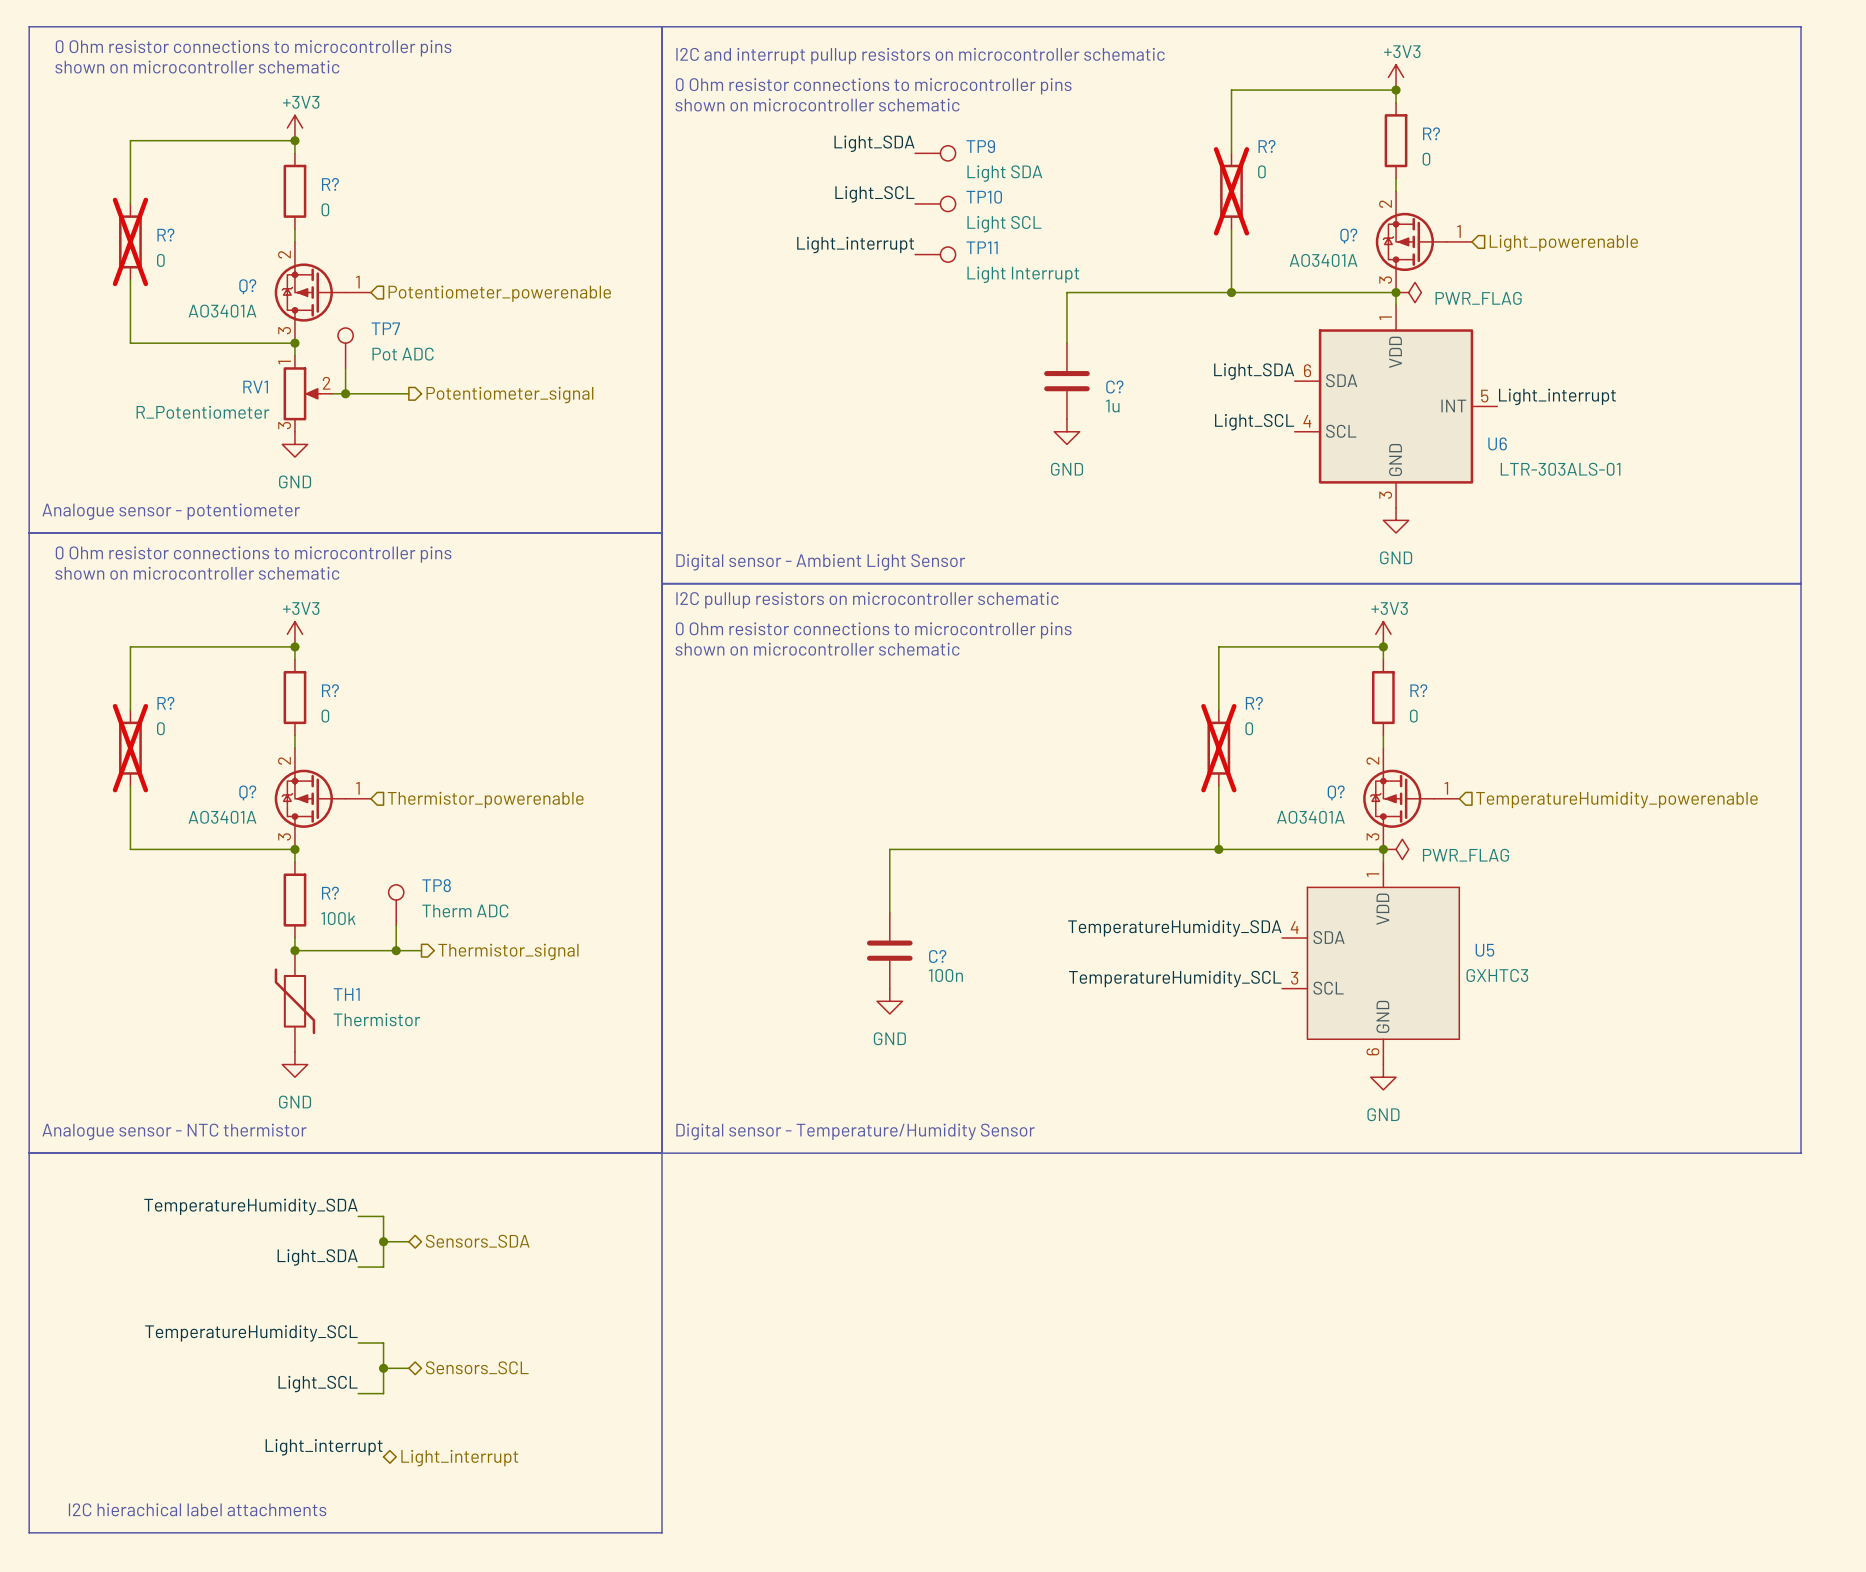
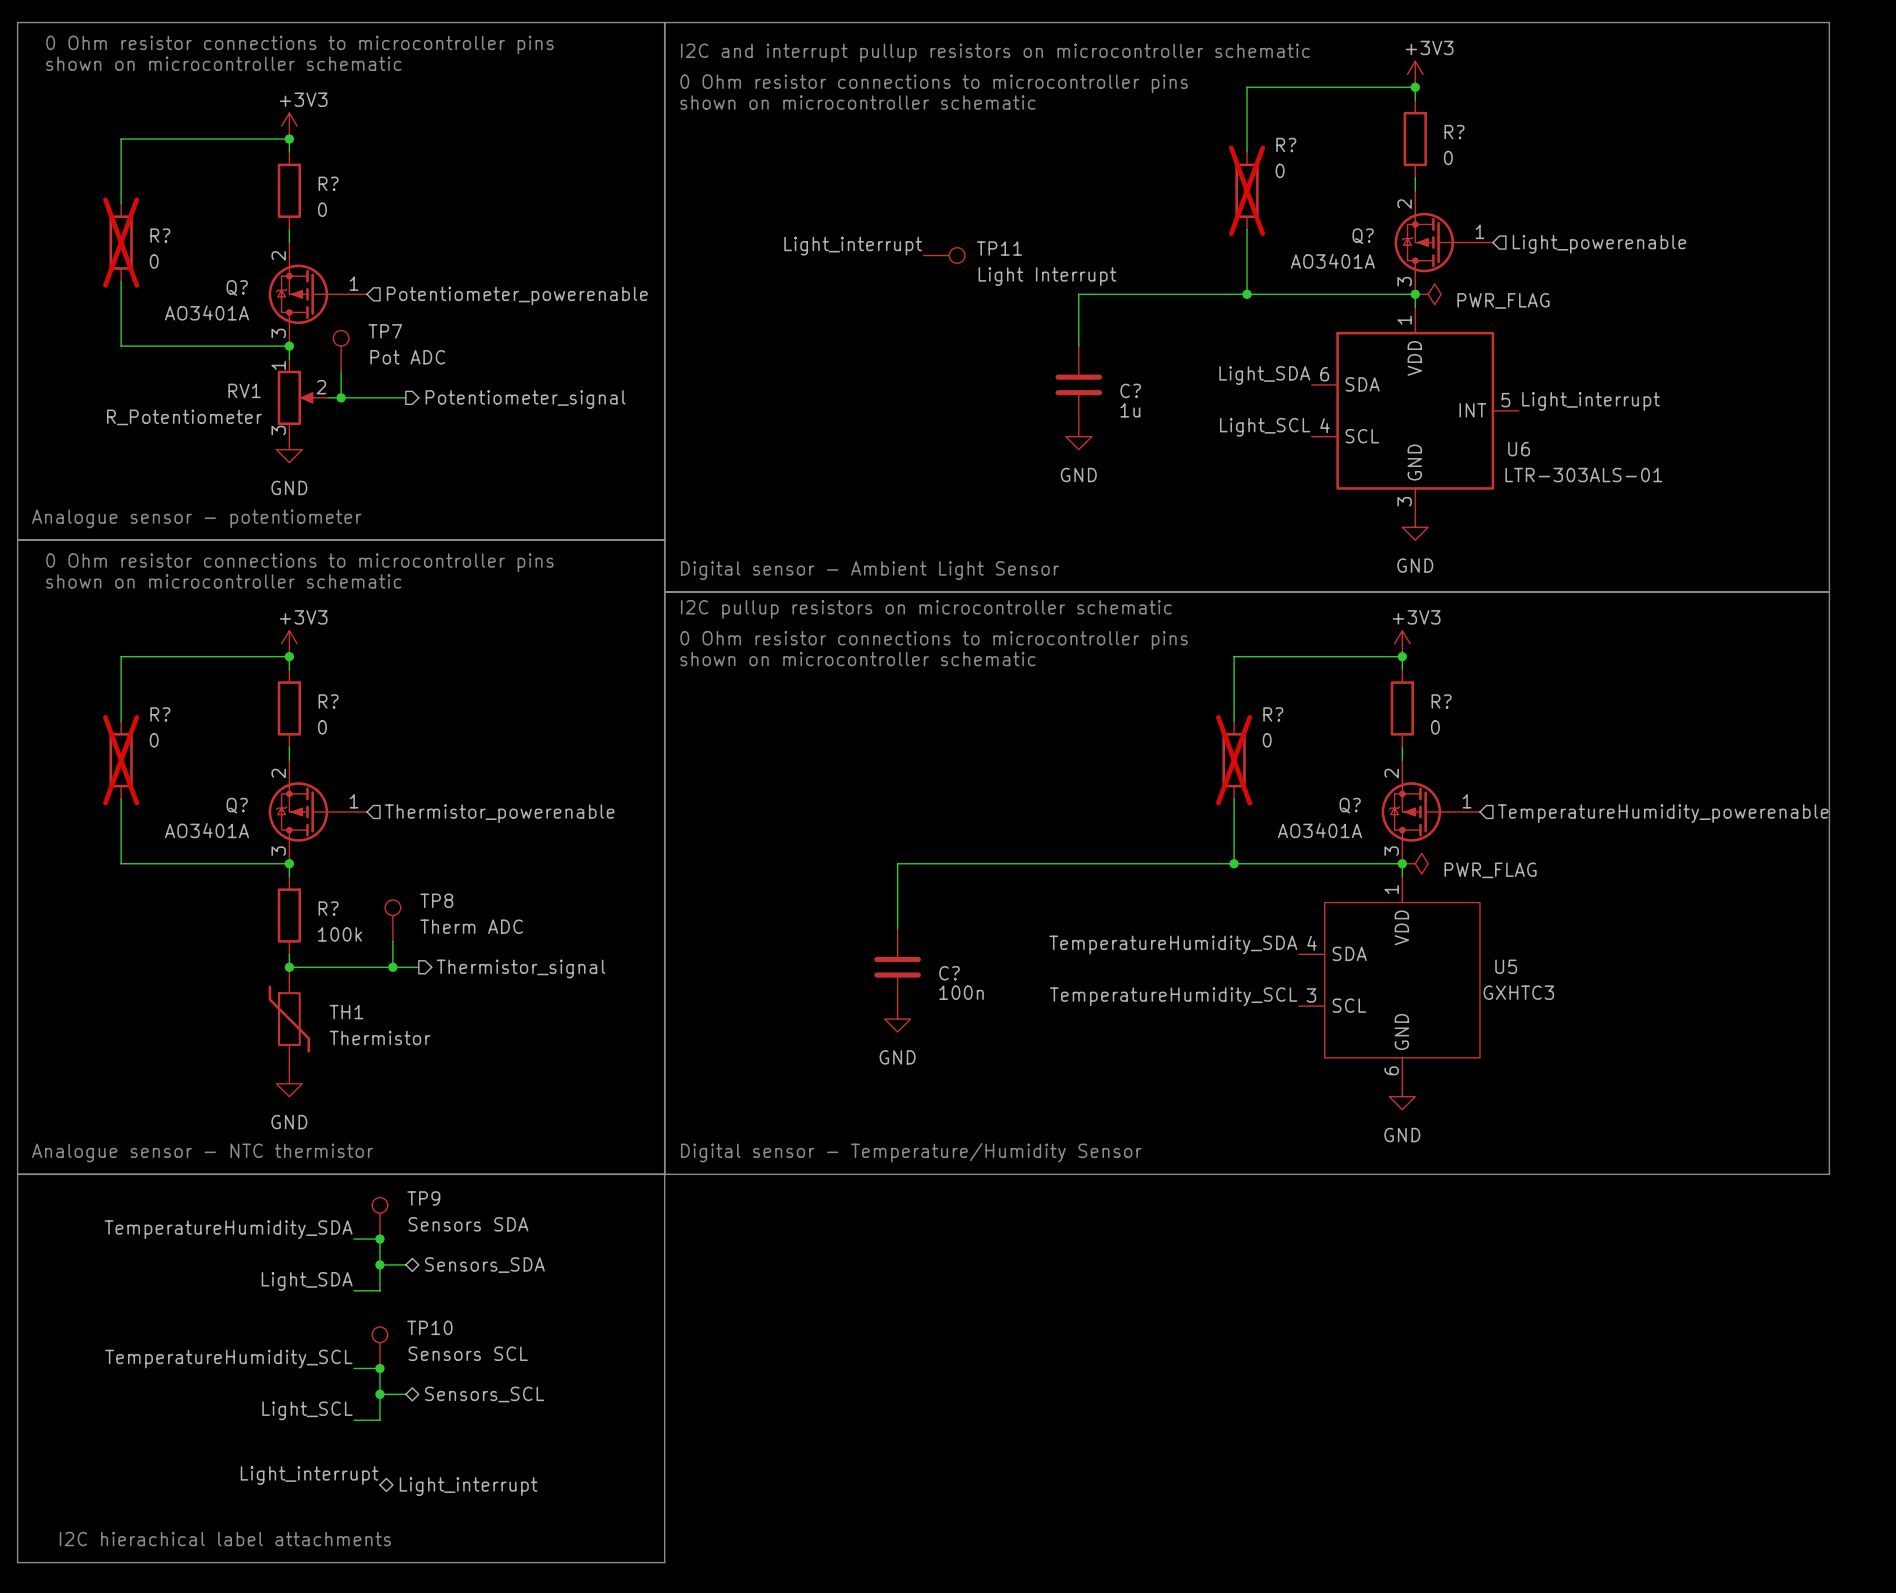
label: Light_SDA (874, 143) -> none
TP9 position: (935, 153) -> (379, 1218)
TP9 rotation: 0° (948, 153) -> 90° counterclockwise (379, 1205)
TP9 value: Light SDA (1004, 173) -> Sensors SDA (468, 1224)
label: Light_SCL (874, 194) -> none
TP10 position: (935, 203) -> (379, 1347)
TP10 rotation: 0° (948, 203) -> 90° counterclockwise (379, 1334)
TP10 value: Light SCL (1004, 224) -> Sensors SCL (468, 1353)
junction: none -> (379, 1239)
junction: none -> (379, 1368)

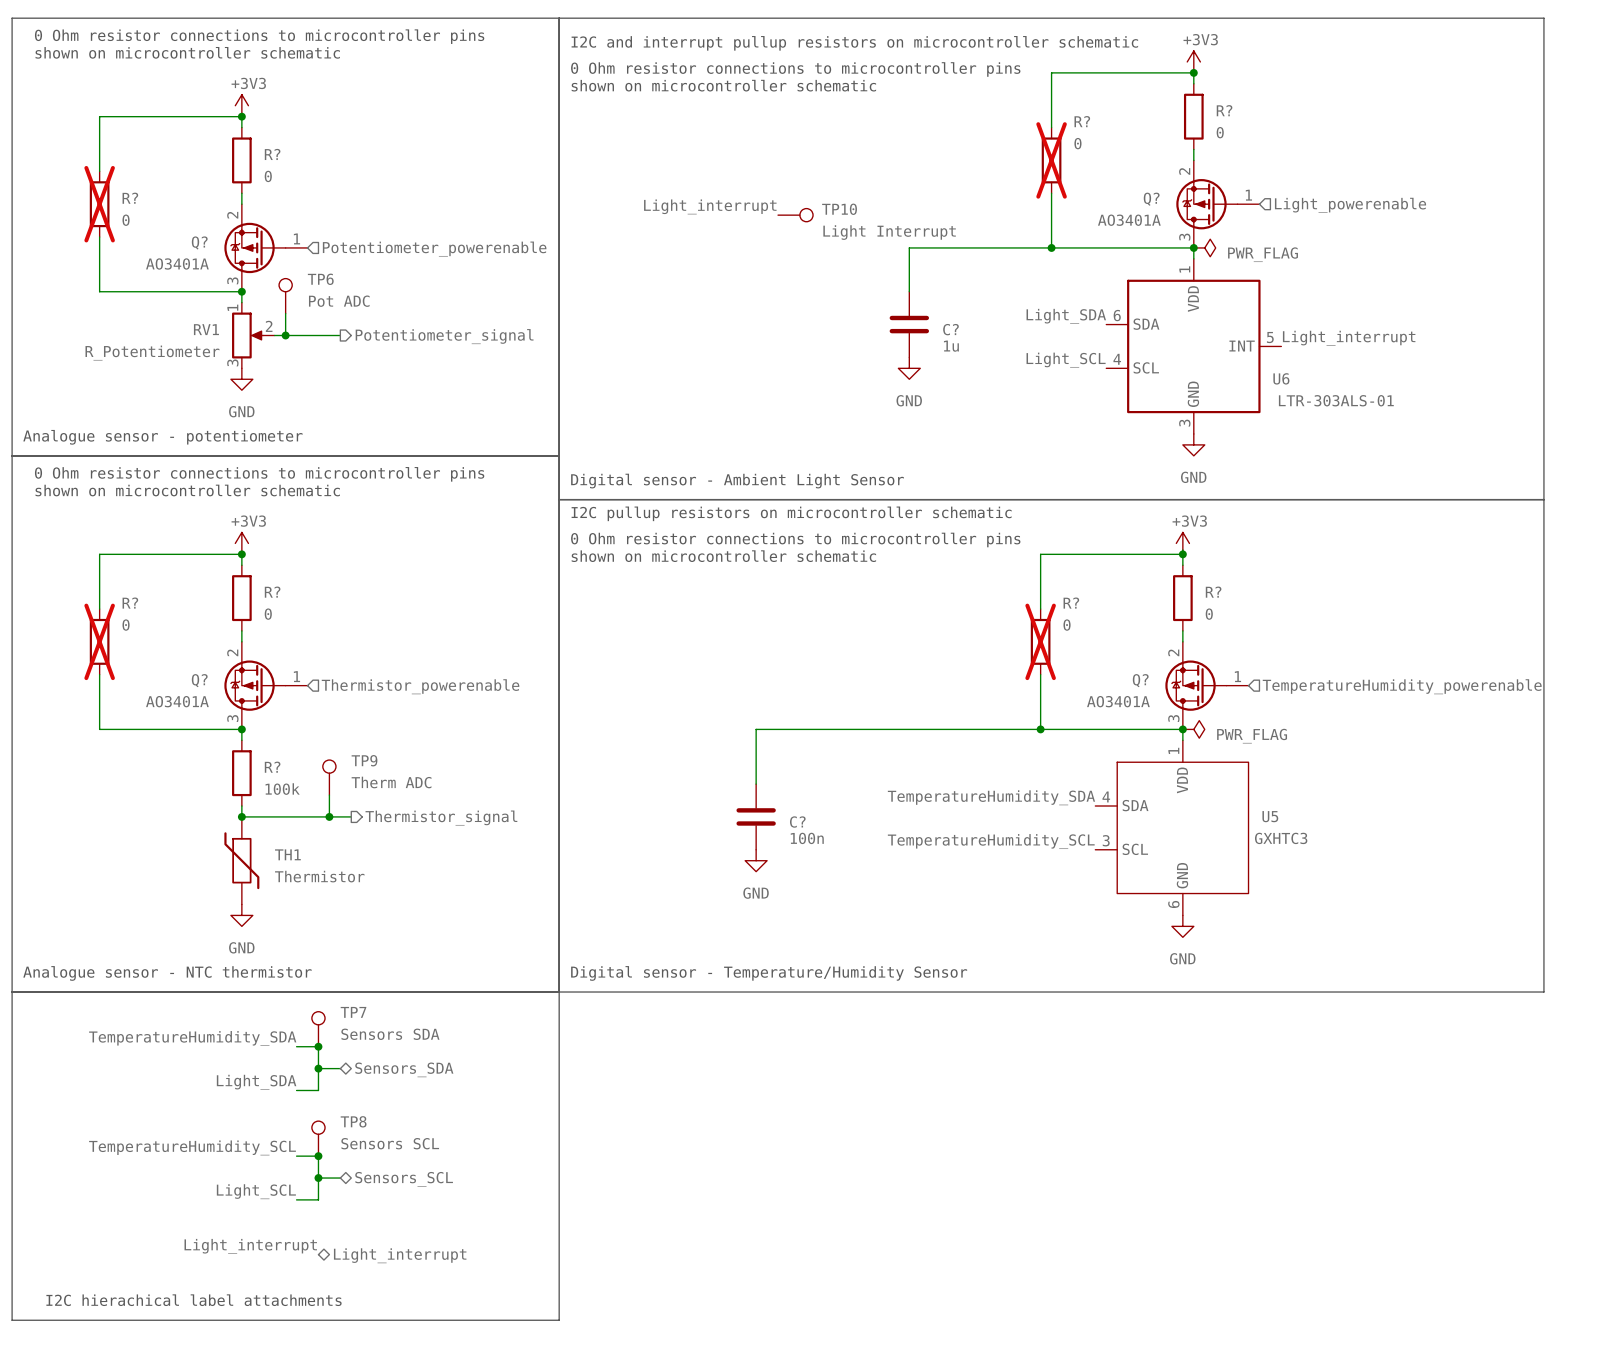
TP11 name: TP11 (999, 248) -> TP10 (839, 209)
TP7 name: TP7 (385, 331) -> TP6 (320, 279)
TP8 name: TP8 (436, 900) -> TP9 (364, 760)
TP9 name: TP9 (423, 1198) -> TP7 (353, 1012)
TP10 name: TP10 (429, 1327) -> TP8 (353, 1121)

